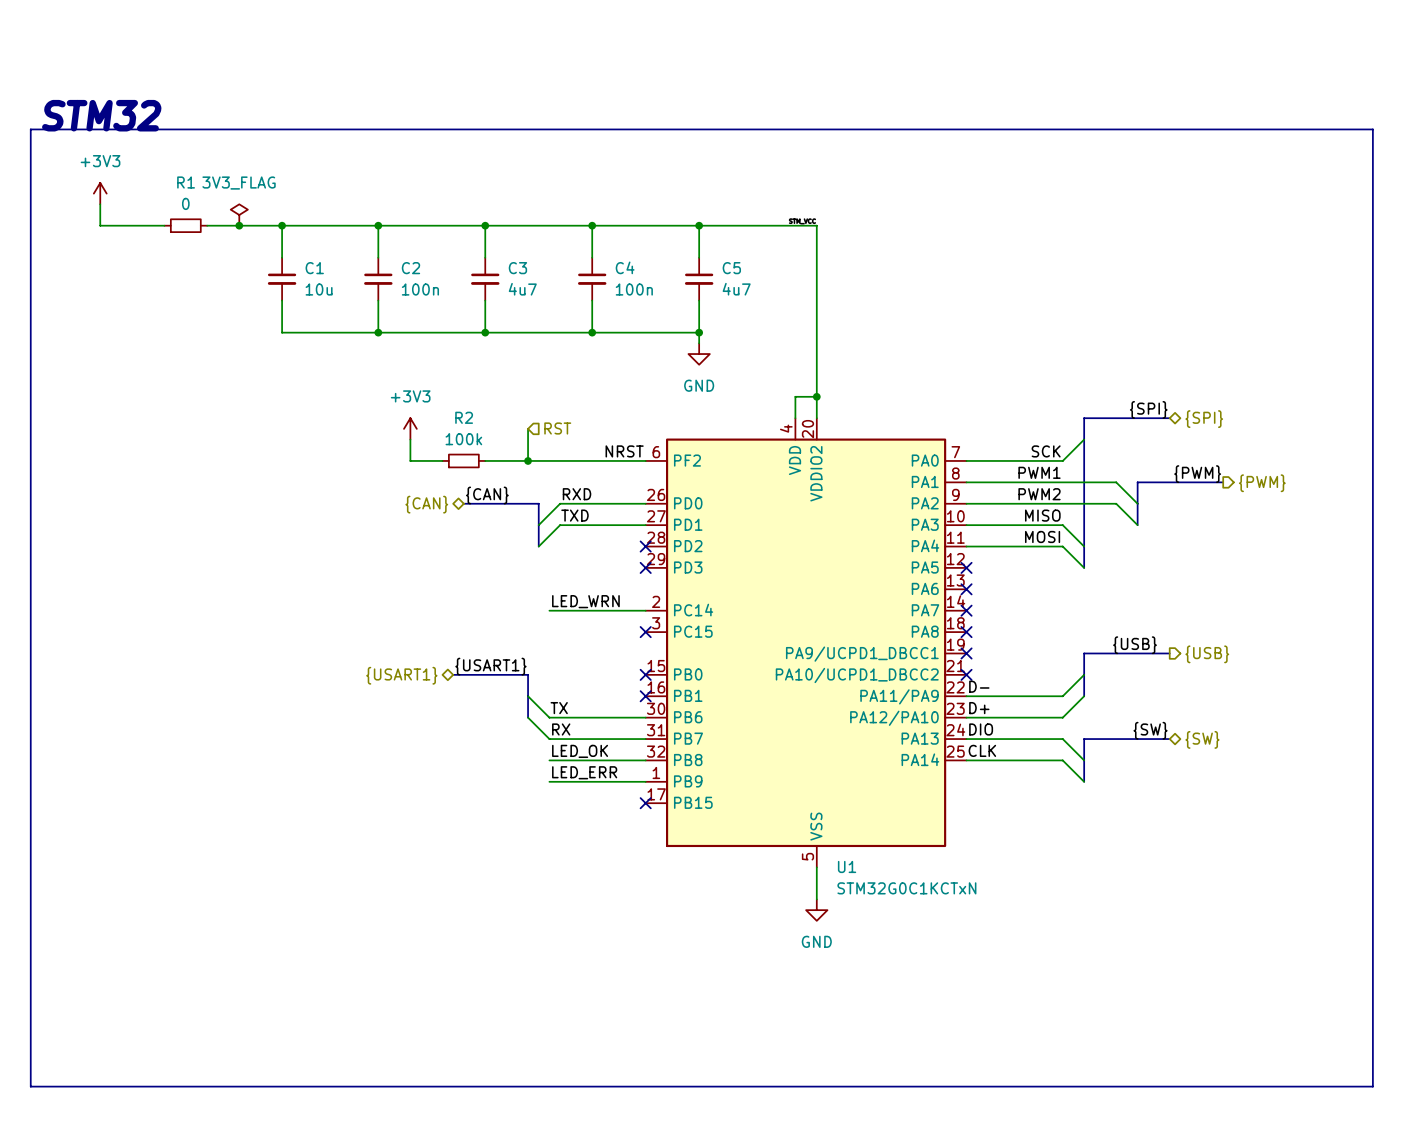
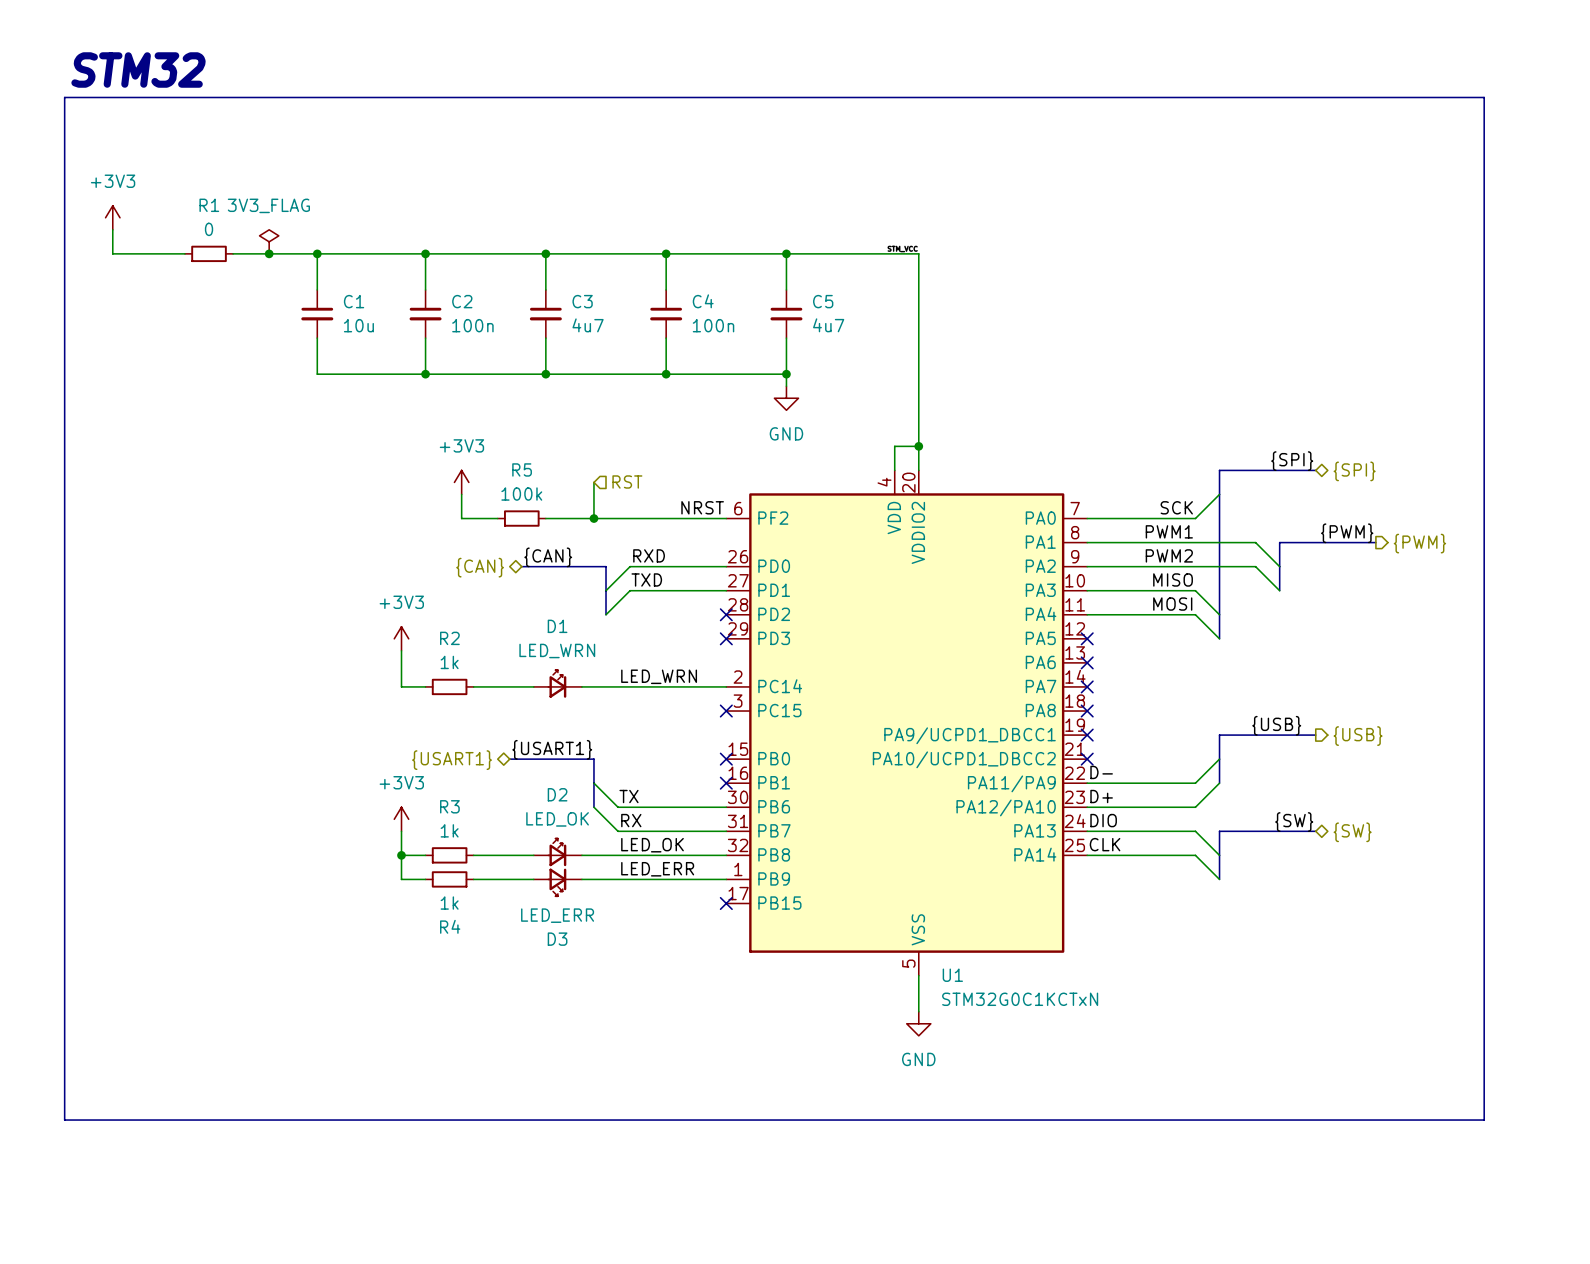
text position: STM32 (101, 115) -> STM32 (138, 70)
line: (30, 129) (1372, 129) (1372, 1086) (30, 1086) (30, 129) -> (64, 97) (64, 1120) (1484, 1120) (1484, 97) (64, 97)
R2 name: R2 (464, 417) -> R5 (522, 469)
power symbol: none -> +3V3 (401, 638)
wire: none -> (401, 650) (401, 686) (425, 686)
D1: none -> LED_WRN (557, 683)
R2: none -> 1k (449, 686)
wire: none -> (473, 686) (533, 686)
wire: none -> (581, 686) (618, 686)
power symbol: none -> +3V3 (401, 819)
wire: none -> (401, 831) (401, 879) (425, 879)
D2: none -> LED_OK (557, 852)
wire: none -> (401, 855) (425, 855)
junction: none -> (401, 855)
R3: none -> 1k (449, 855)
wire: none -> (473, 855) (533, 855)
wire: none -> (581, 855) (618, 855)
R4: none -> 1k (449, 879)
wire: none -> (473, 879) (533, 879)
wire: none -> (581, 879) (618, 879)
D3: none -> LED_ERR (557, 882)

